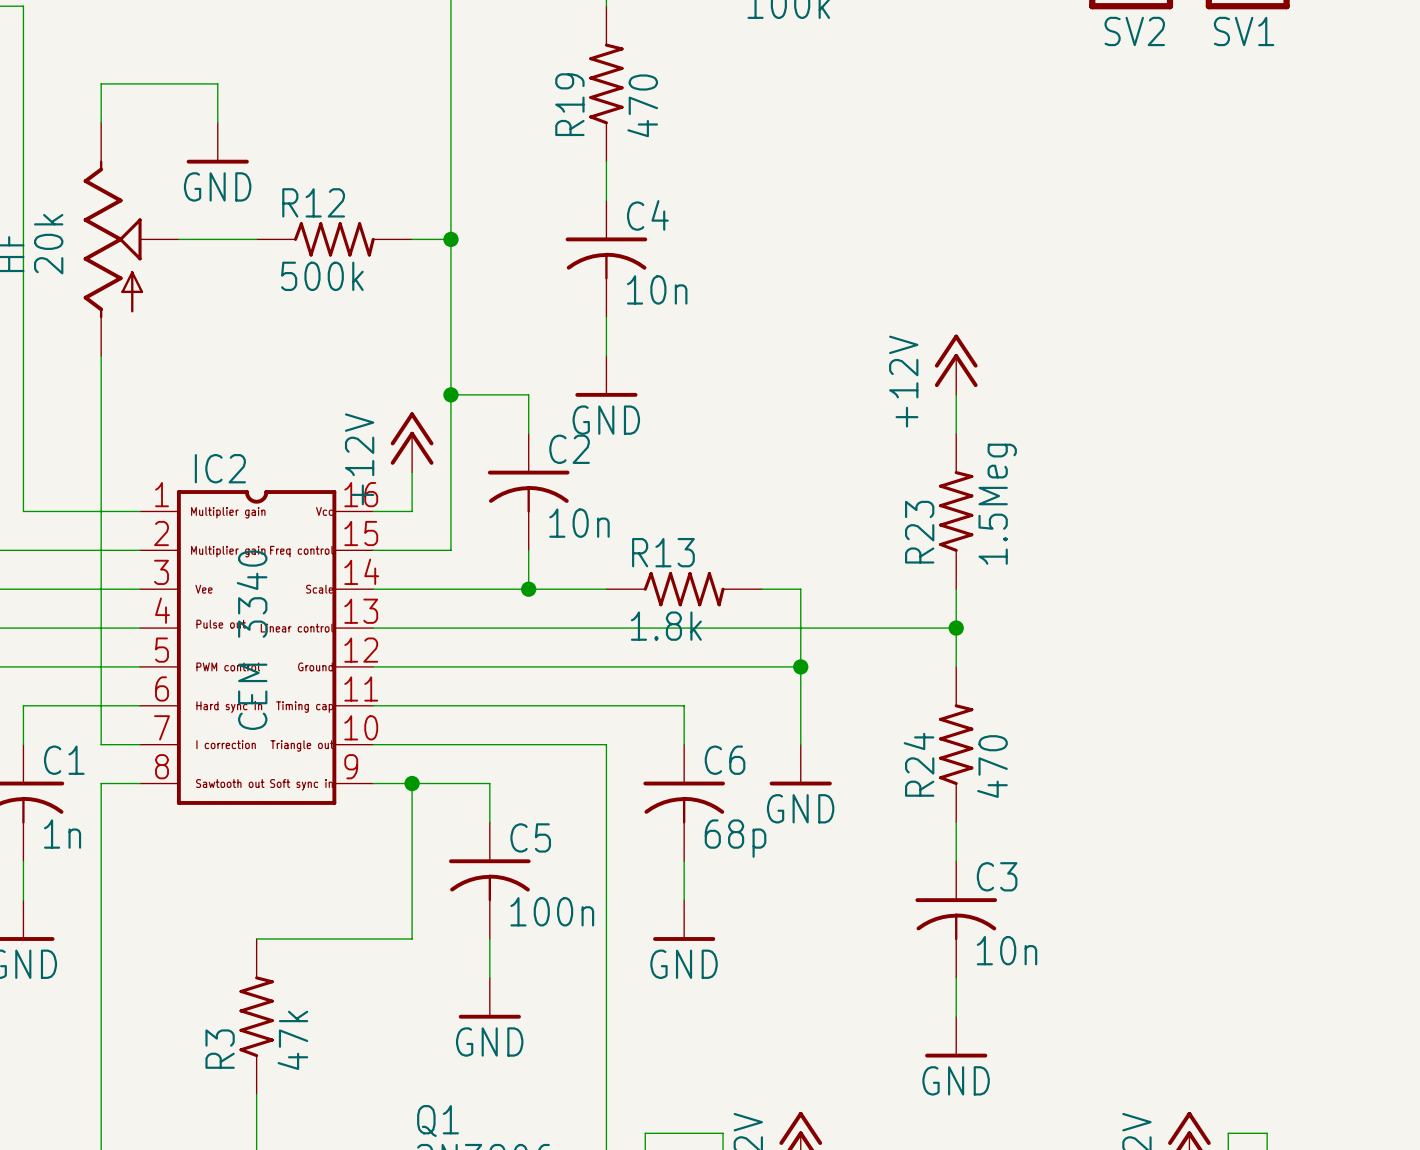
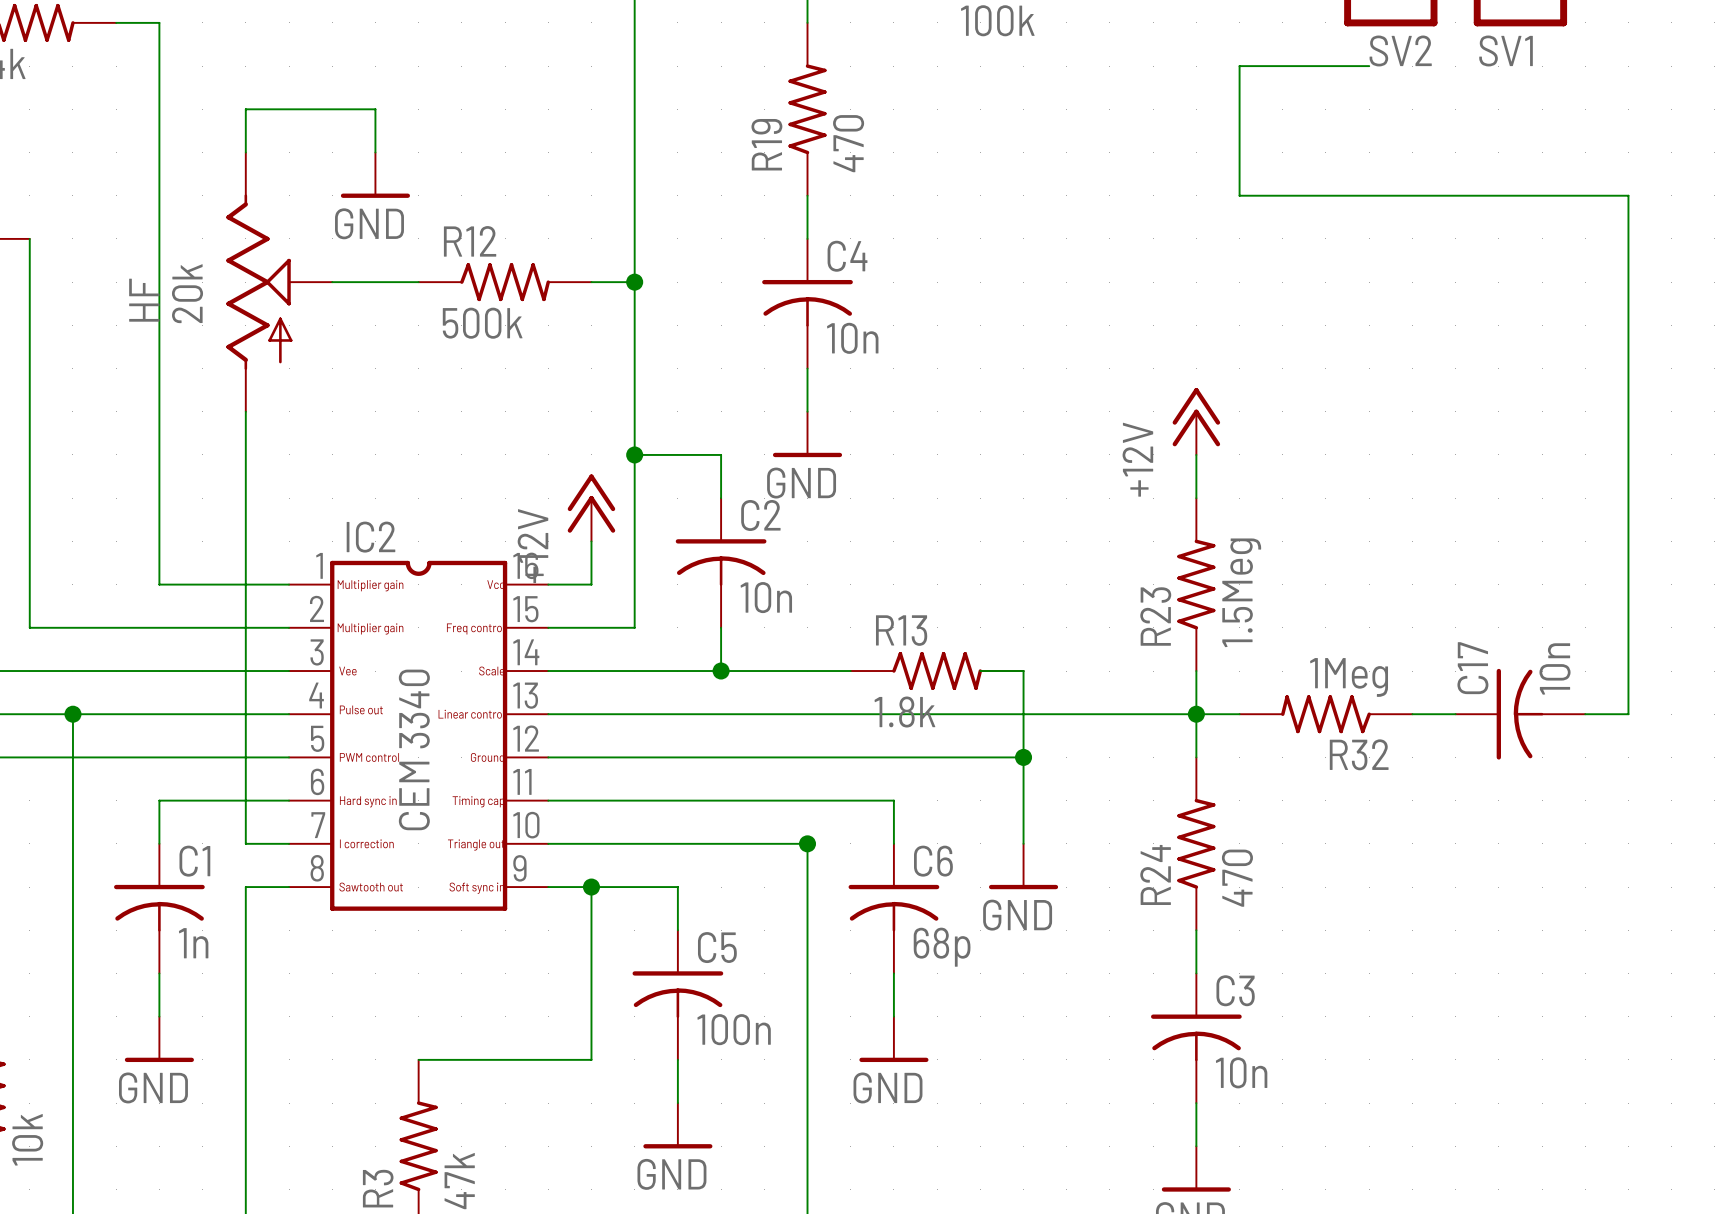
wire: none -> (1369, 66) (1239, 66) (1239, 195) (1628, 195) (1628, 714) (1585, 714)
R13 position: (684, 589) -> (937, 671)
wire: none -> (1196, 714) (1239, 714)
R32: none -> 1Meg (1325, 714)
wire: none -> (1412, 714) (1455, 714)
C17: none -> 10n (1520, 714)
junction: none -> (807, 843)

